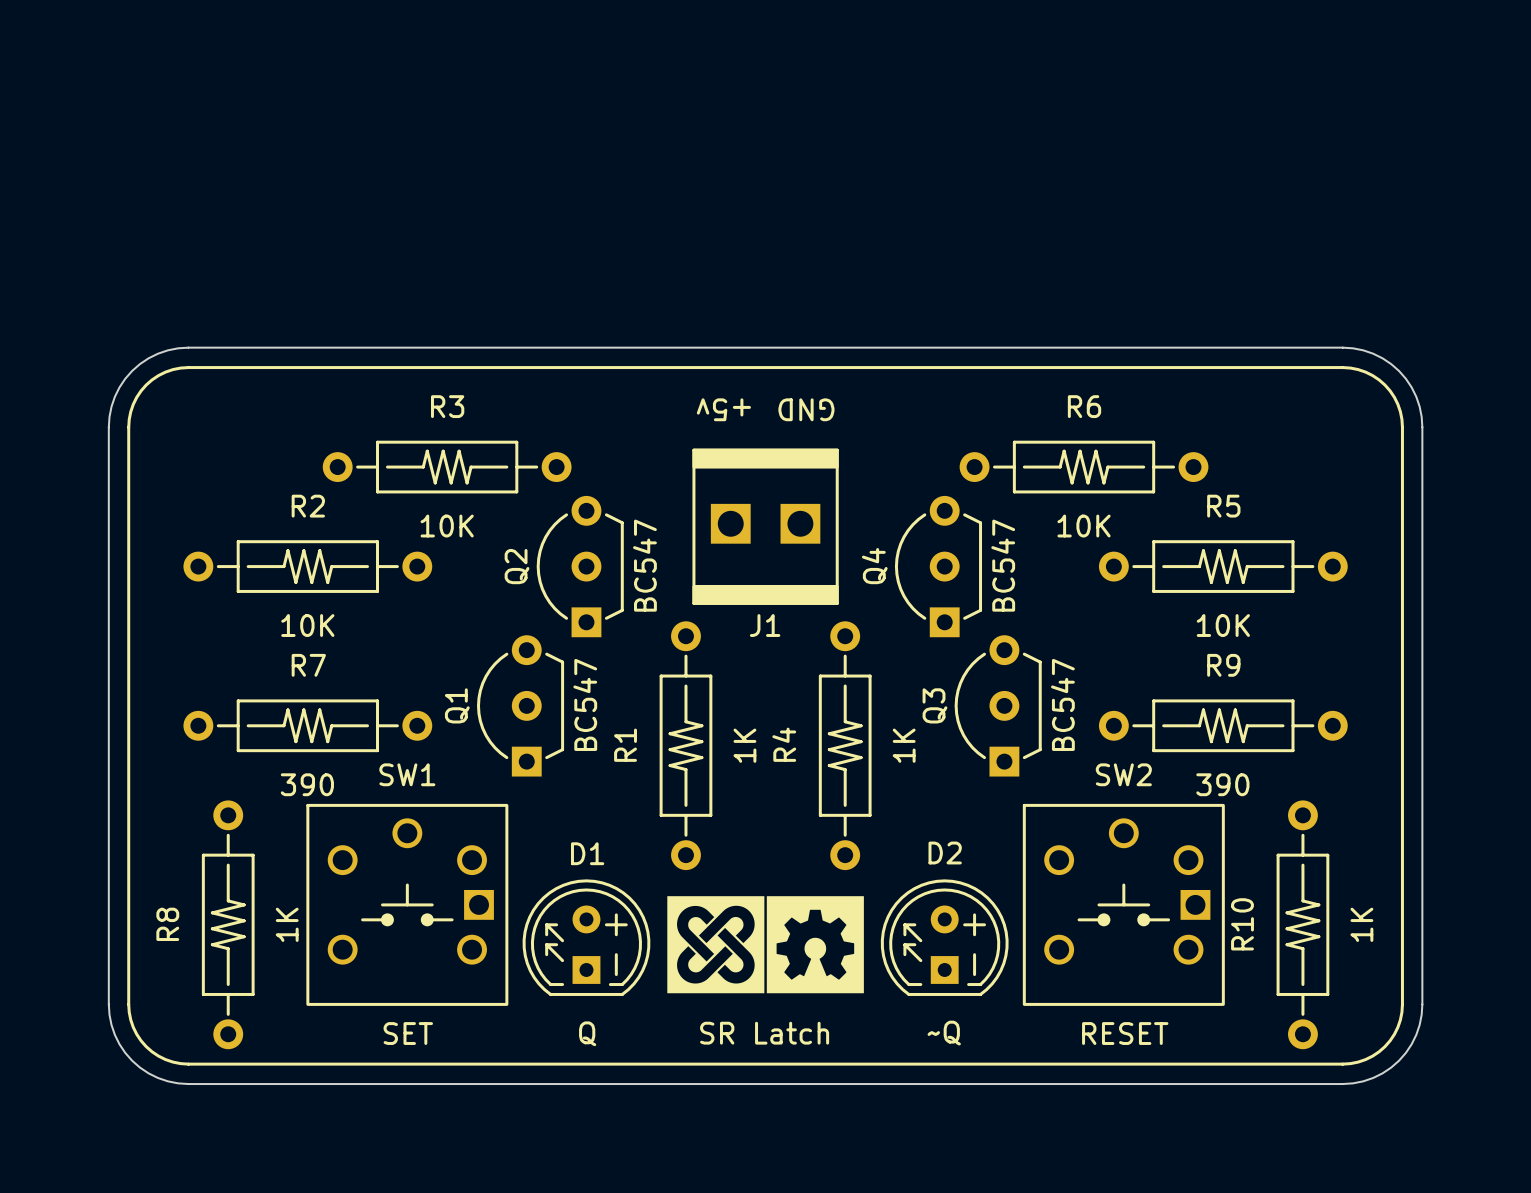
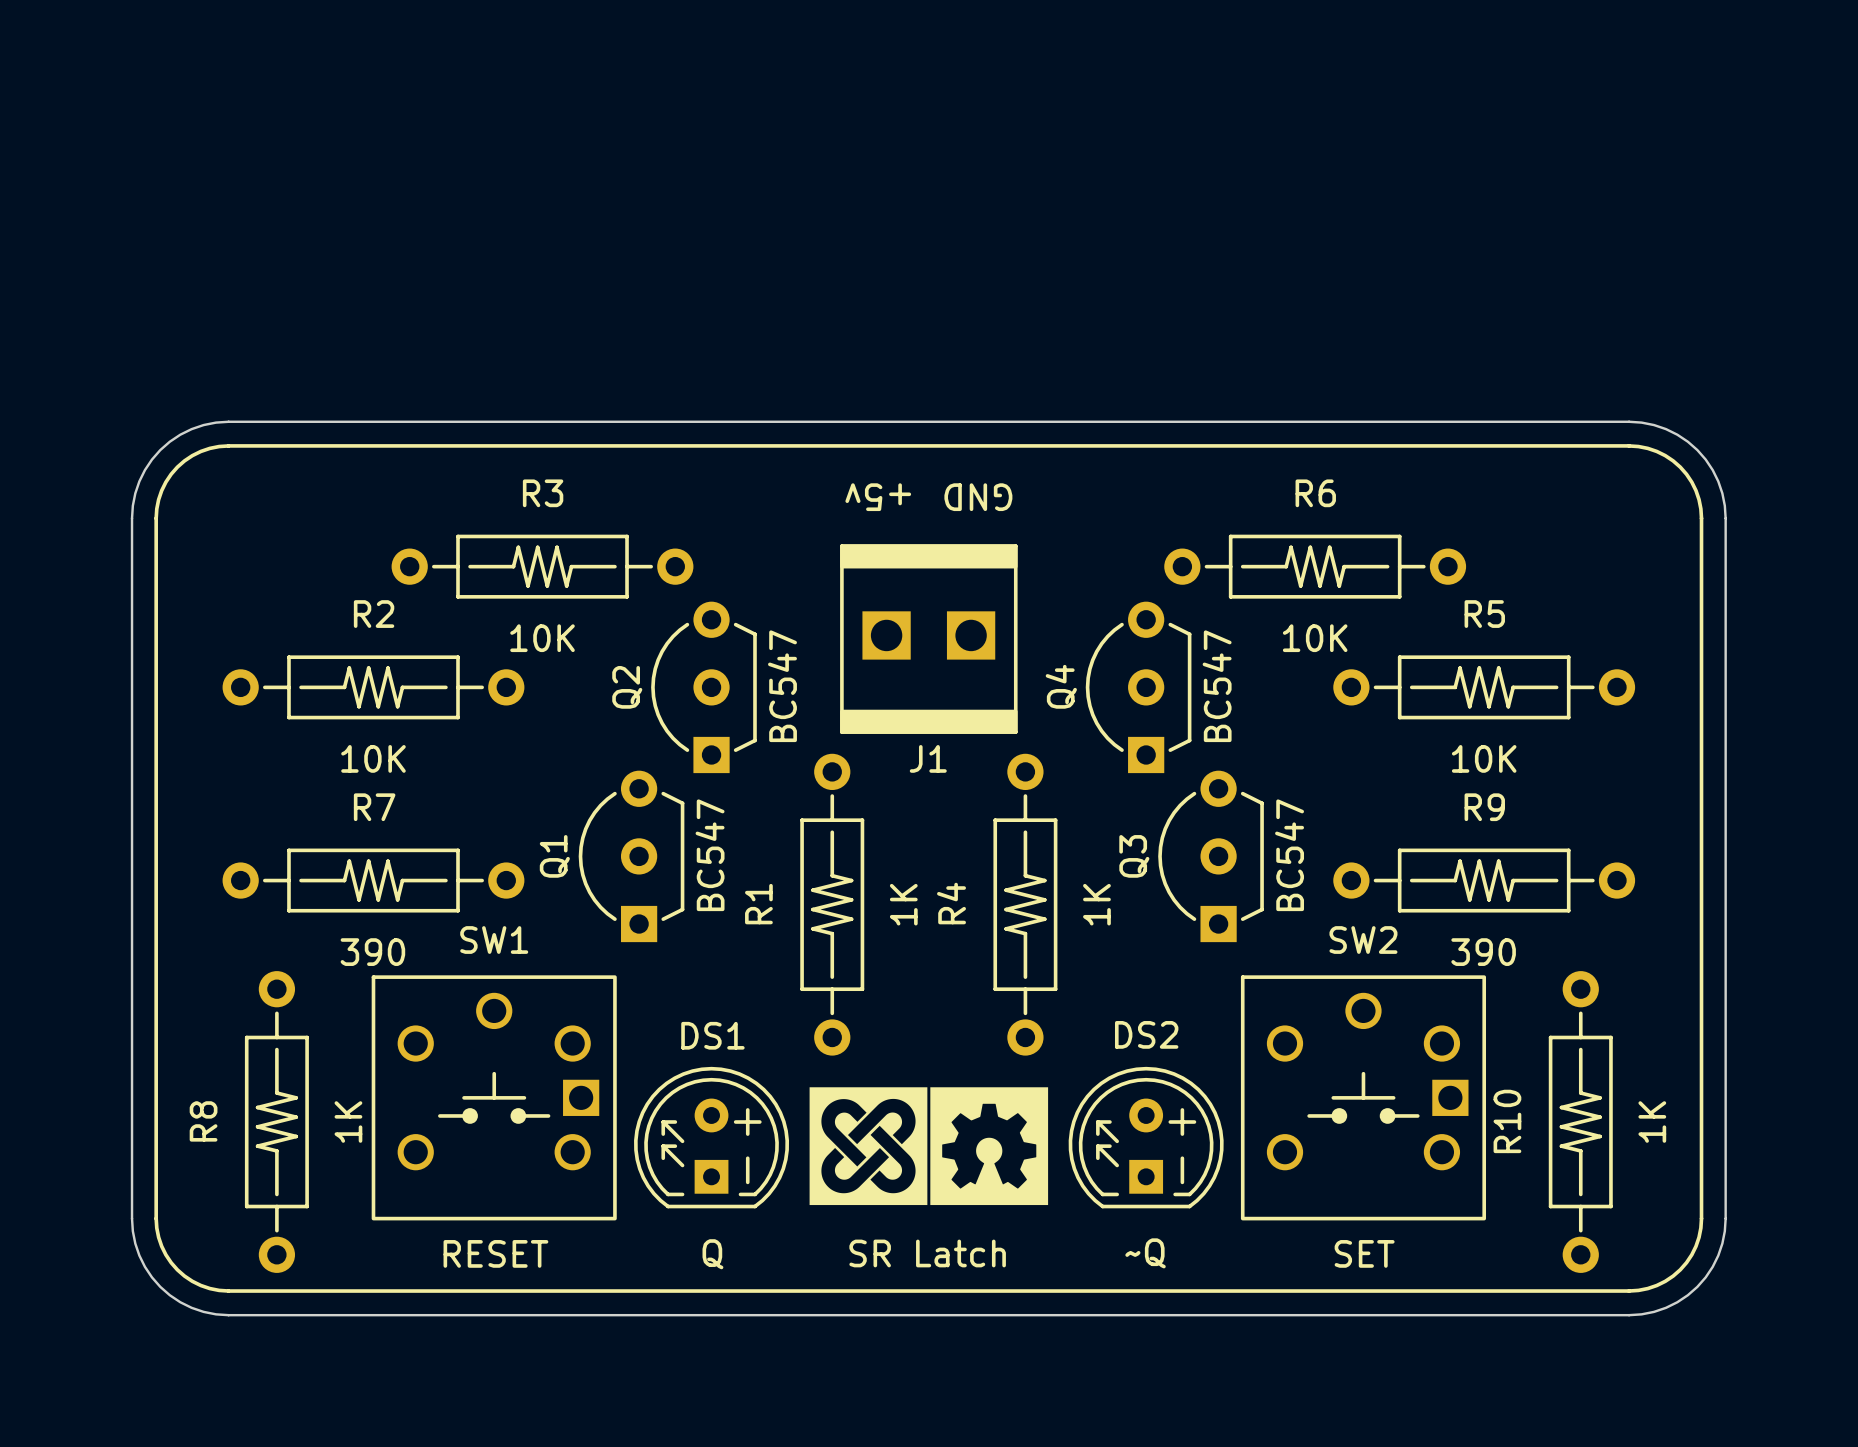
D1 name: D1 (587, 853) -> DS1 (712, 1035)
D2 name: D2 (945, 853) -> DS2 (1146, 1034)
SW1 value: SET (408, 1033) -> RESET (495, 1253)
SW2 value: RESET (1125, 1033) -> SET (1364, 1253)

